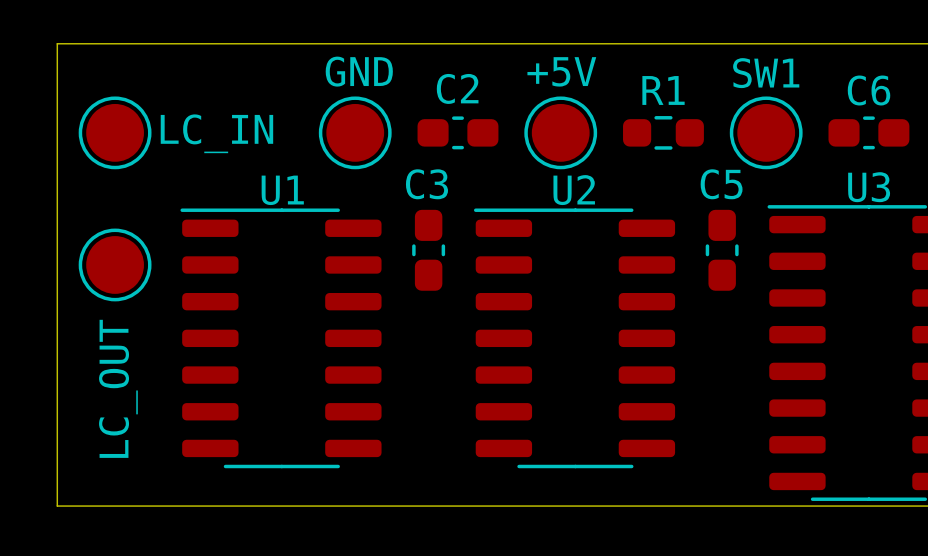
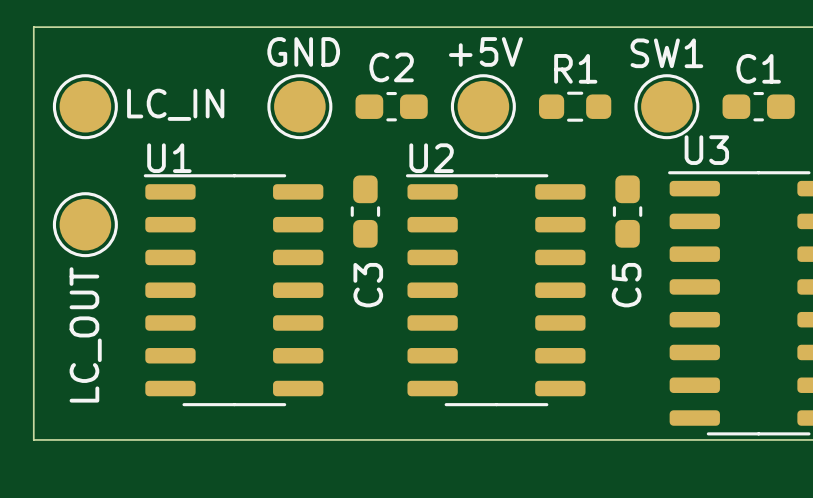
C6 name: C6 (869, 90) -> C1 (758, 68)
C3 name rotation: 0° (426, 184) -> 90° counterclockwise (368, 285)
C3 name position: C3 (426, 184) -> C3 (368, 285)
C5 name rotation: 0° (721, 184) -> 90° counterclockwise (626, 285)
C5 name position: C5 (721, 184) -> C5 (626, 285)
U3 name position: U3 (869, 187) -> U3 (706, 150)
U1 name position: U1 (282, 190) -> U1 (169, 158)
U2 name position: U2 (574, 190) -> U2 (431, 158)

